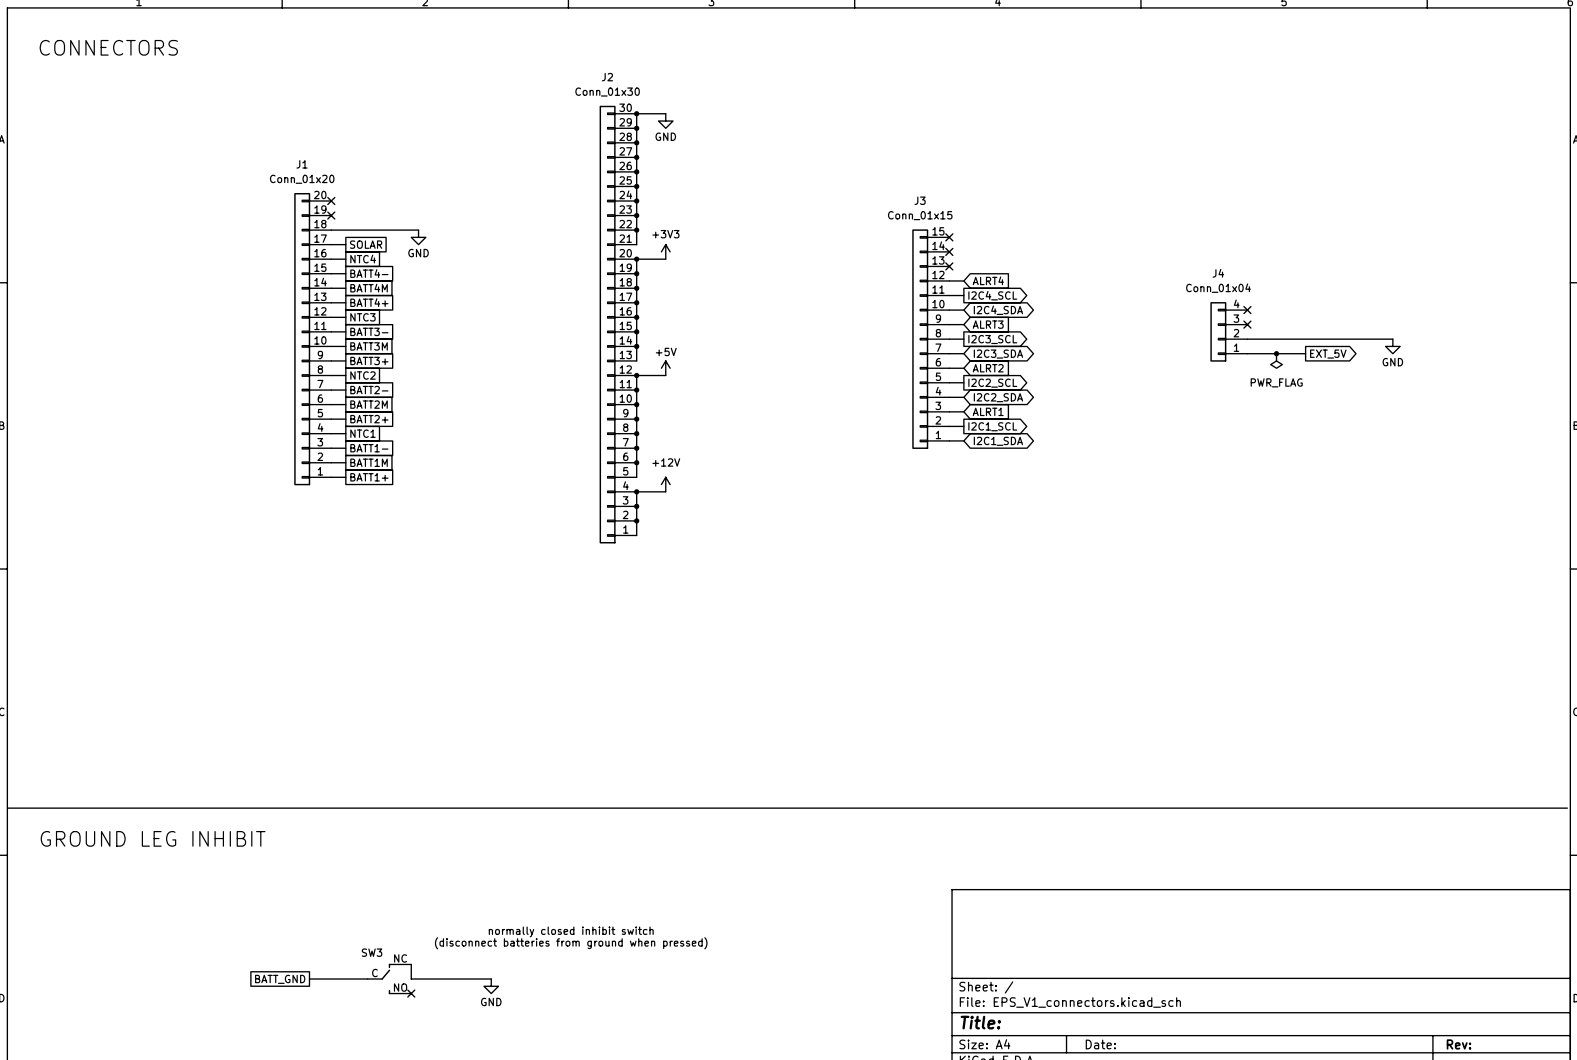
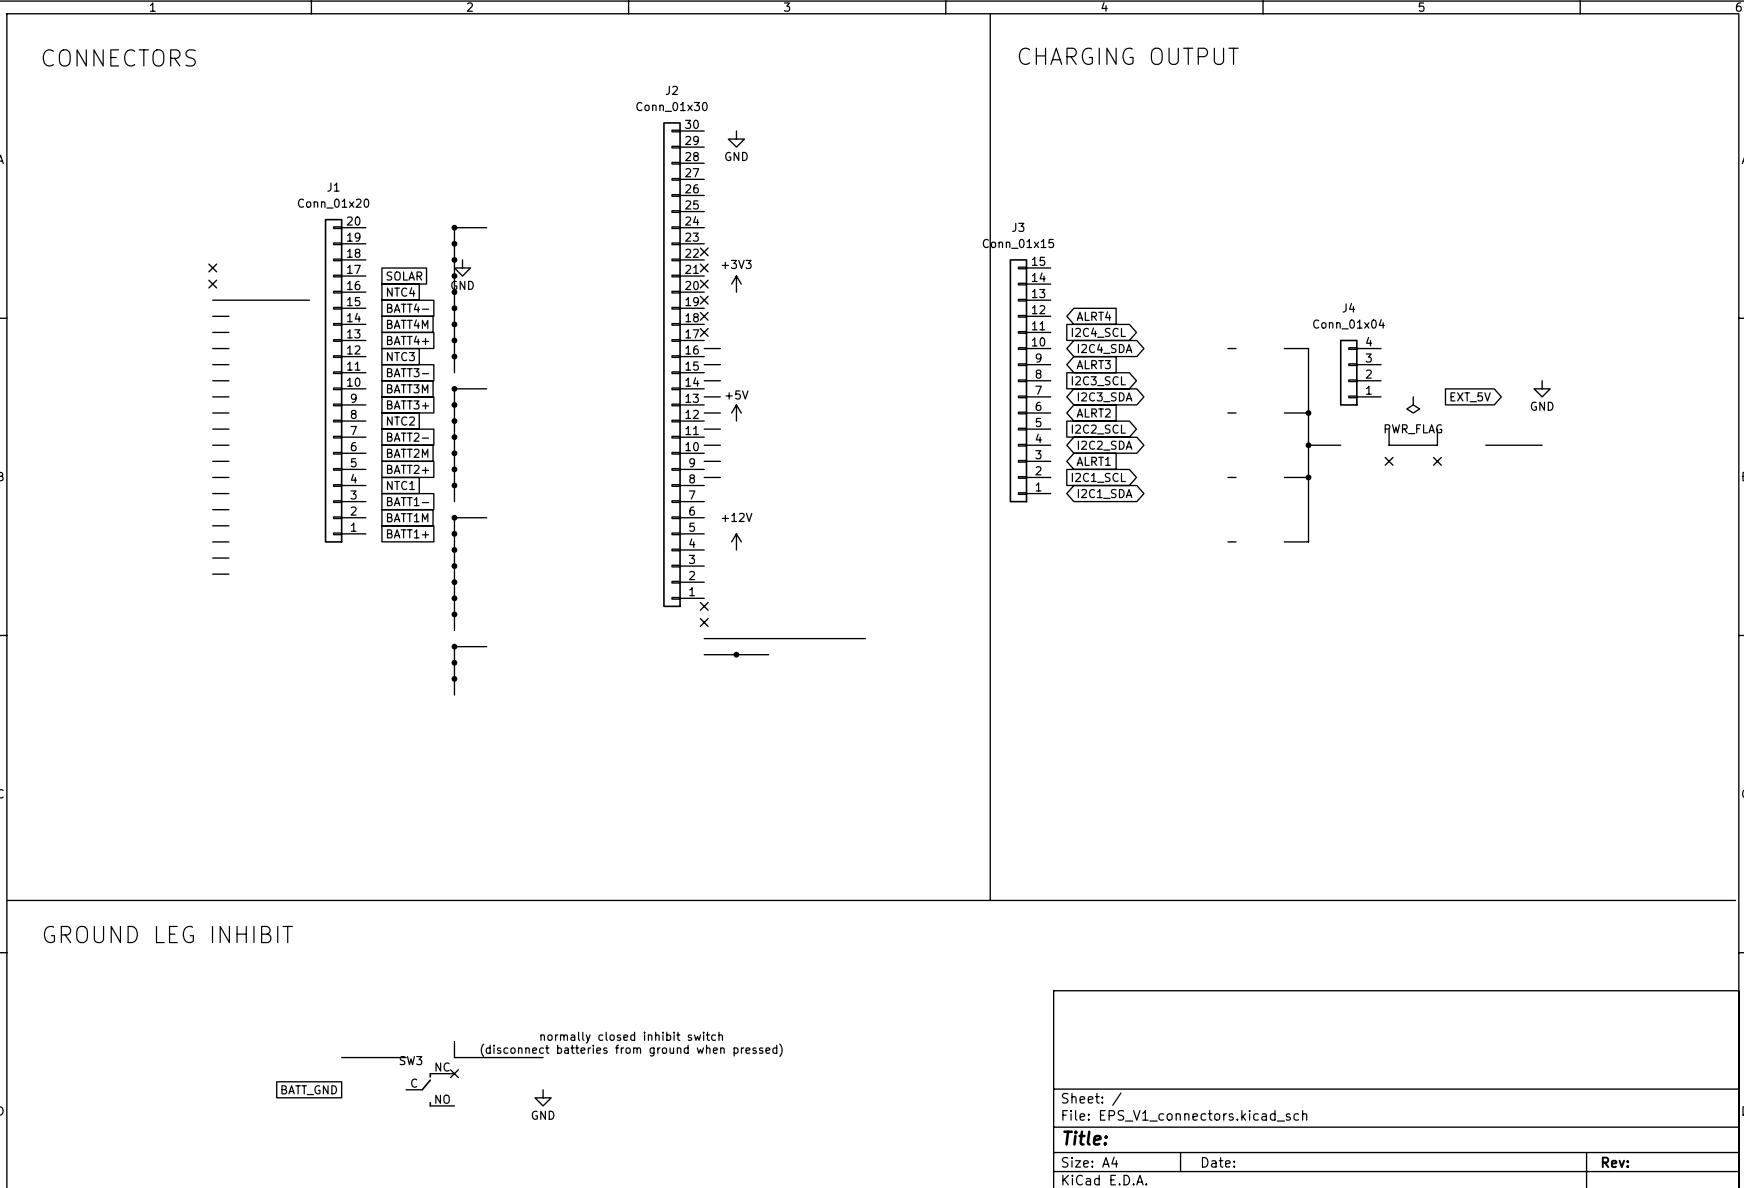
line: none -> (990, 14) (990, 900)
text: none -> CHARGING OUTPUT (1128, 56)
junction: (636, 113) -> none
wire: (665, 113) (636, 113) (636, 244) -> none
junction: (636, 128) -> none
junction: (636, 142) -> none
junction: (636, 157) -> none
junction: (636, 171) -> none
junction: (636, 186) -> none
no-connect mark: (331, 201) -> none
junction: none -> (454, 227)
wire: none -> (486, 227) (454, 227) (454, 372)
junction: (636, 201) -> none
no-connect mark: (331, 215) -> none
junction: none -> (454, 243)
junction: (636, 215) -> none
no-connect mark: none -> (704, 251)
wire: (331, 230) (418, 230) -> (212, 300) (309, 300)
junction: none -> (454, 259)
junction: (636, 230) -> none
no-connect mark: none -> (212, 267)
no-connect mark: none -> (704, 267)
no-connect mark: (949, 237) -> none
wire: (331, 244) (345, 244) -> (212, 316) (228, 316)
junction: none -> (454, 276)
no-connect mark: none -> (212, 284)
no-connect mark: none -> (704, 284)
no-connect mark: (949, 251) -> none
wire: (331, 259) (345, 259) -> (212, 332) (228, 332)
junction: none -> (454, 292)
junction: (636, 259) -> none
wire: (665, 259) (636, 259) (636, 360) -> none
no-connect mark: none -> (704, 300)
no-connect mark: (949, 266) -> none
wire: (331, 273) (345, 273) -> (212, 348) (228, 348)
junction: none -> (454, 308)
junction: (636, 273) -> none
no-connect mark: none -> (704, 316)
wire: (949, 280) (963, 280) -> none
wire: (331, 288) (345, 288) -> (212, 364) (228, 364)
junction: none -> (454, 324)
junction: (636, 288) -> none
no-connect mark: none -> (704, 332)
wire: (949, 295) (963, 295) -> none
wire: (331, 302) (345, 302) -> (212, 380) (228, 380)
junction: none -> (454, 340)
junction: (636, 302) -> none
wire: none -> (704, 348) (720, 348)
wire: (949, 310) (963, 310) -> none
wire: none -> (1227, 348) (1235, 348)
wire: none -> (1284, 348) (1308, 348) (1308, 541) (1284, 541)
no-connect mark: (1247, 310) -> none
wire: (331, 317) (345, 317) -> (212, 396) (228, 396)
junction: none -> (454, 356)
junction: (636, 317) -> none
wire: none -> (704, 364) (720, 364)
wire: (949, 324) (963, 324) -> none
no-connect mark: (1247, 324) -> none
wire: (331, 331) (345, 331) -> (212, 413) (228, 413)
junction: (636, 331) -> none
wire: none -> (704, 380) (720, 380)
wire: (949, 339) (963, 339) -> none
wire: (1247, 339) (1392, 339) -> none
wire: (331, 346) (345, 346) -> (212, 429) (228, 429)
junction: none -> (454, 388)
wire: none -> (486, 388) (454, 388) (454, 501)
junction: (636, 346) -> none
wire: none -> (704, 396) (720, 396)
wire: (949, 353) (963, 353) -> none
wire: (1247, 353) (1305, 353) -> none
junction: (1276, 353) -> none
wire: (331, 360) (345, 360) -> (212, 445) (228, 445)
junction: none -> (454, 404)
wire: none -> (704, 413) (720, 413)
wire: (949, 368) (963, 368) -> none
wire: none -> (1227, 413) (1235, 413)
wire: none -> (1284, 413) (1308, 413)
junction: none -> (1308, 413)
wire: (331, 375) (345, 375) -> (212, 461) (228, 461)
junction: none -> (454, 421)
junction: (636, 375) -> none
wire: (665, 375) (636, 375) (636, 477) -> none
wire: none -> (704, 429) (720, 429)
wire: (949, 382) (963, 382) -> none
wire: none -> (1389, 429) (1389, 445) (1437, 445) (1437, 429)
wire: (331, 390) (345, 390) -> (212, 477) (228, 477)
junction: none -> (454, 437)
junction: (636, 390) -> none
wire: none -> (704, 445) (720, 445)
wire: (949, 397) (963, 397) -> none
wire: none -> (1308, 445) (1340, 445)
junction: none -> (1308, 445)
wire: none -> (1485, 445) (1542, 445)
wire: (331, 404) (345, 404) -> (212, 493) (228, 493)
junction: none -> (454, 453)
junction: (636, 404) -> none
wire: none -> (704, 461) (720, 461)
wire: (949, 411) (963, 411) -> none
no-connect mark: none -> (1389, 461)
no-connect mark: none -> (1437, 461)
wire: (331, 419) (345, 419) -> (212, 509) (228, 509)
junction: none -> (454, 469)
junction: (636, 419) -> none
wire: none -> (704, 477) (720, 477)
wire: (949, 426) (963, 426) -> none
wire: none -> (1227, 477) (1235, 477)
wire: none -> (1284, 477) (1308, 477)
junction: none -> (1308, 477)
wire: (331, 433) (345, 433) -> (212, 525) (228, 525)
junction: none -> (454, 485)
junction: (636, 433) -> none
wire: (949, 440) (963, 440) -> none
wire: (331, 448) (345, 448) -> (212, 541) (228, 541)
junction: (636, 448) -> none
wire: (331, 462) (345, 462) -> (212, 558) (228, 558)
junction: none -> (454, 517)
wire: none -> (486, 517) (454, 517) (454, 630)
junction: (636, 462) -> none
wire: (331, 477) (345, 477) -> (212, 574) (228, 574)
junction: none -> (454, 533)
wire: none -> (1227, 541) (1235, 541)
junction: none -> (454, 549)
junction: (636, 491) -> none
wire: (665, 491) (636, 491) (636, 535) -> none
junction: none -> (454, 566)
junction: (636, 506) -> none
junction: none -> (454, 582)
junction: (636, 520) -> none
junction: none -> (454, 598)
no-connect mark: none -> (704, 606)
junction: none -> (454, 614)
no-connect mark: none -> (704, 622)
wire: none -> (704, 638) (865, 638)
junction: none -> (454, 646)
wire: none -> (486, 646) (454, 646) (454, 694)
wire: none -> (704, 654) (768, 654)
junction: none -> (736, 654)
junction: none -> (454, 662)
junction: none -> (454, 678)
wire: (411, 964) (411, 979) (491, 979) -> (454, 1041) (454, 1057) (543, 1057)
wire: (309, 979) (367, 979) -> (341, 1057) (406, 1057)
no-connect mark position: (411, 993) -> (454, 1073)

